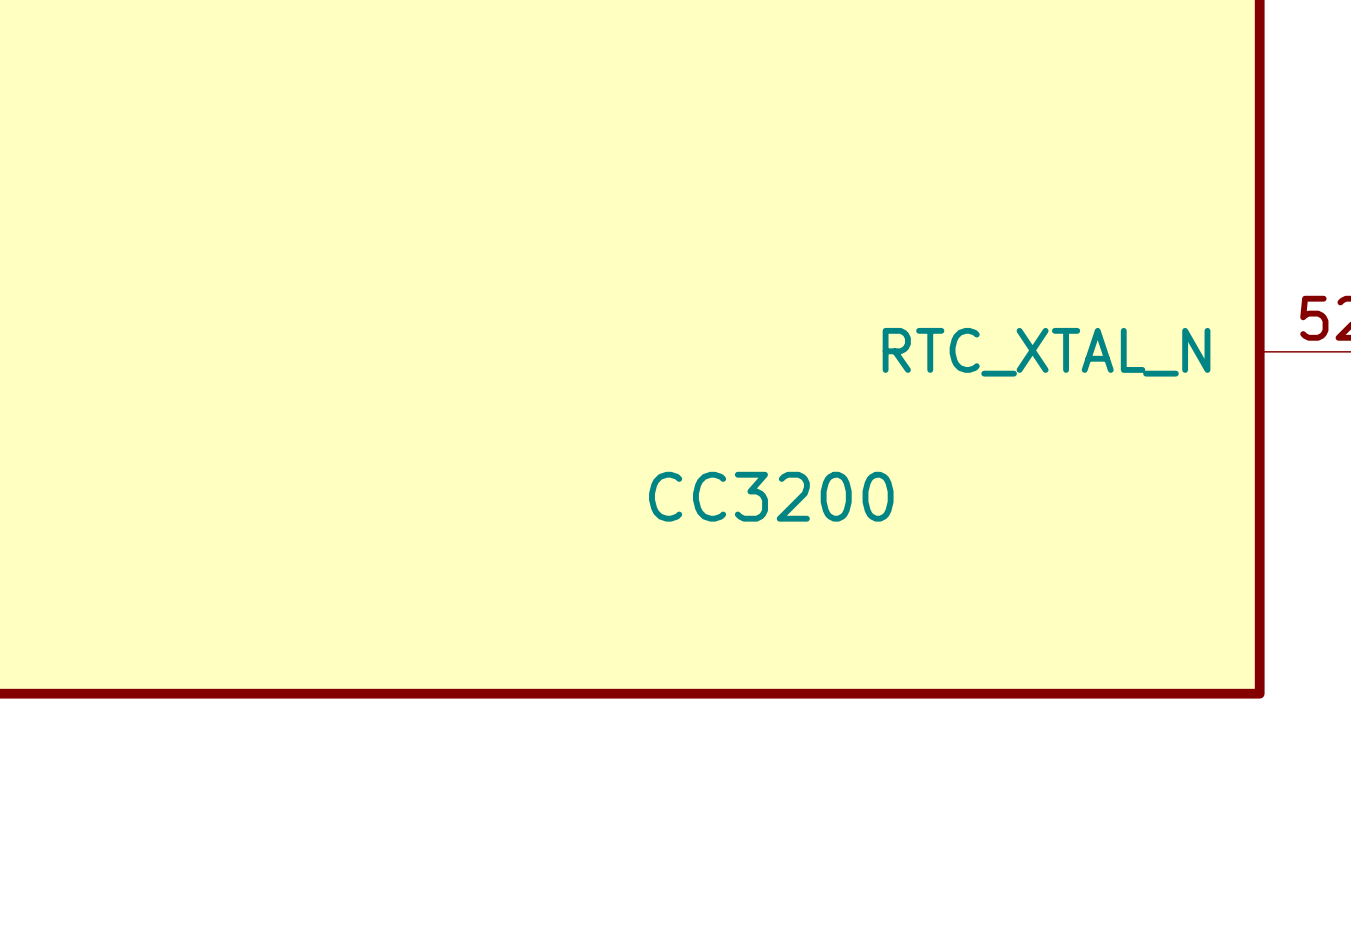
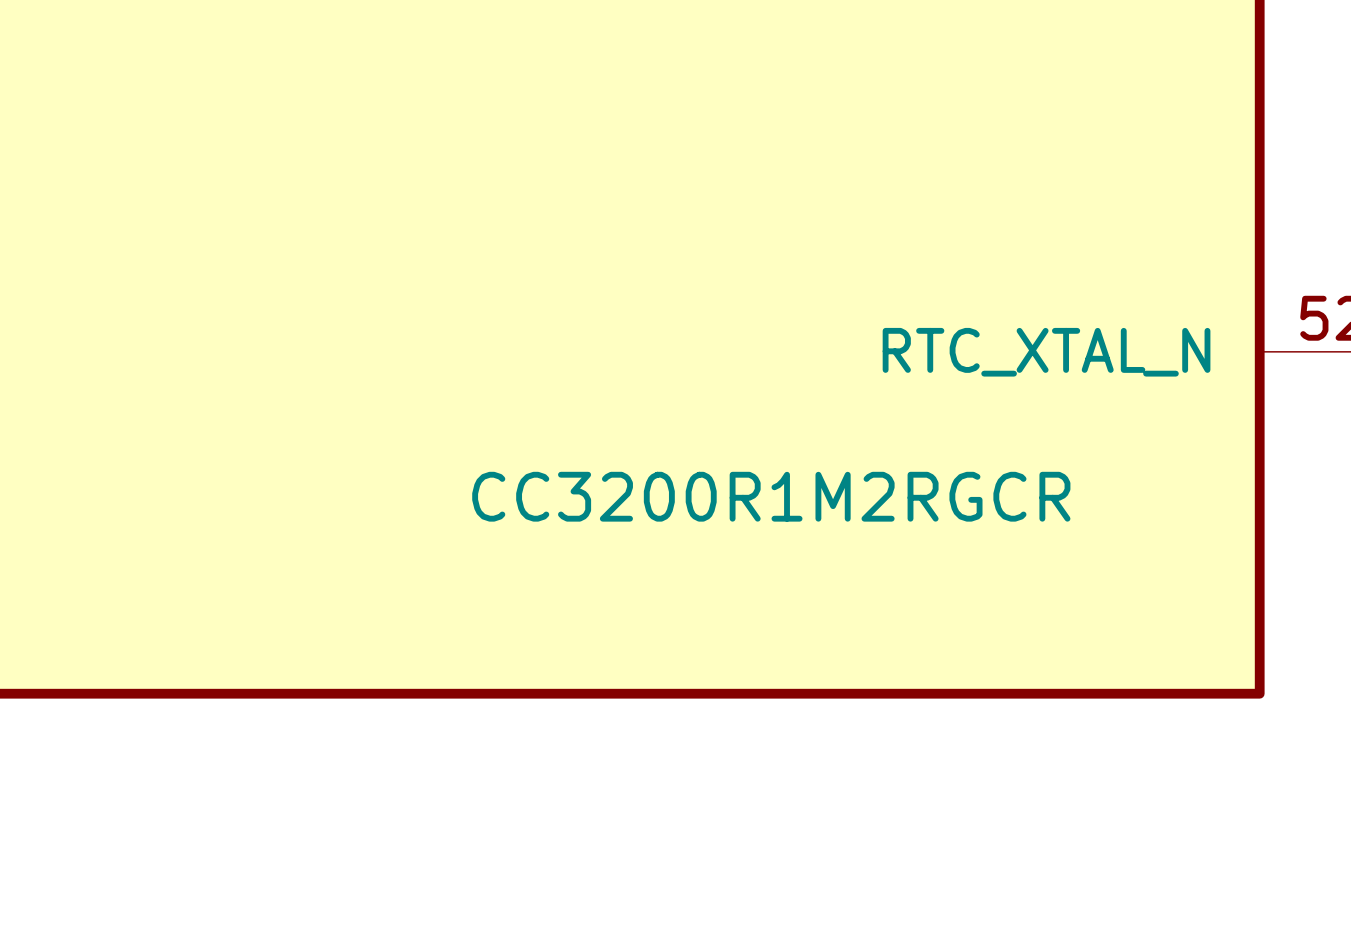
part value: CC3200 (771, 496) -> CC3200R1M2RGCR (771, 496)

